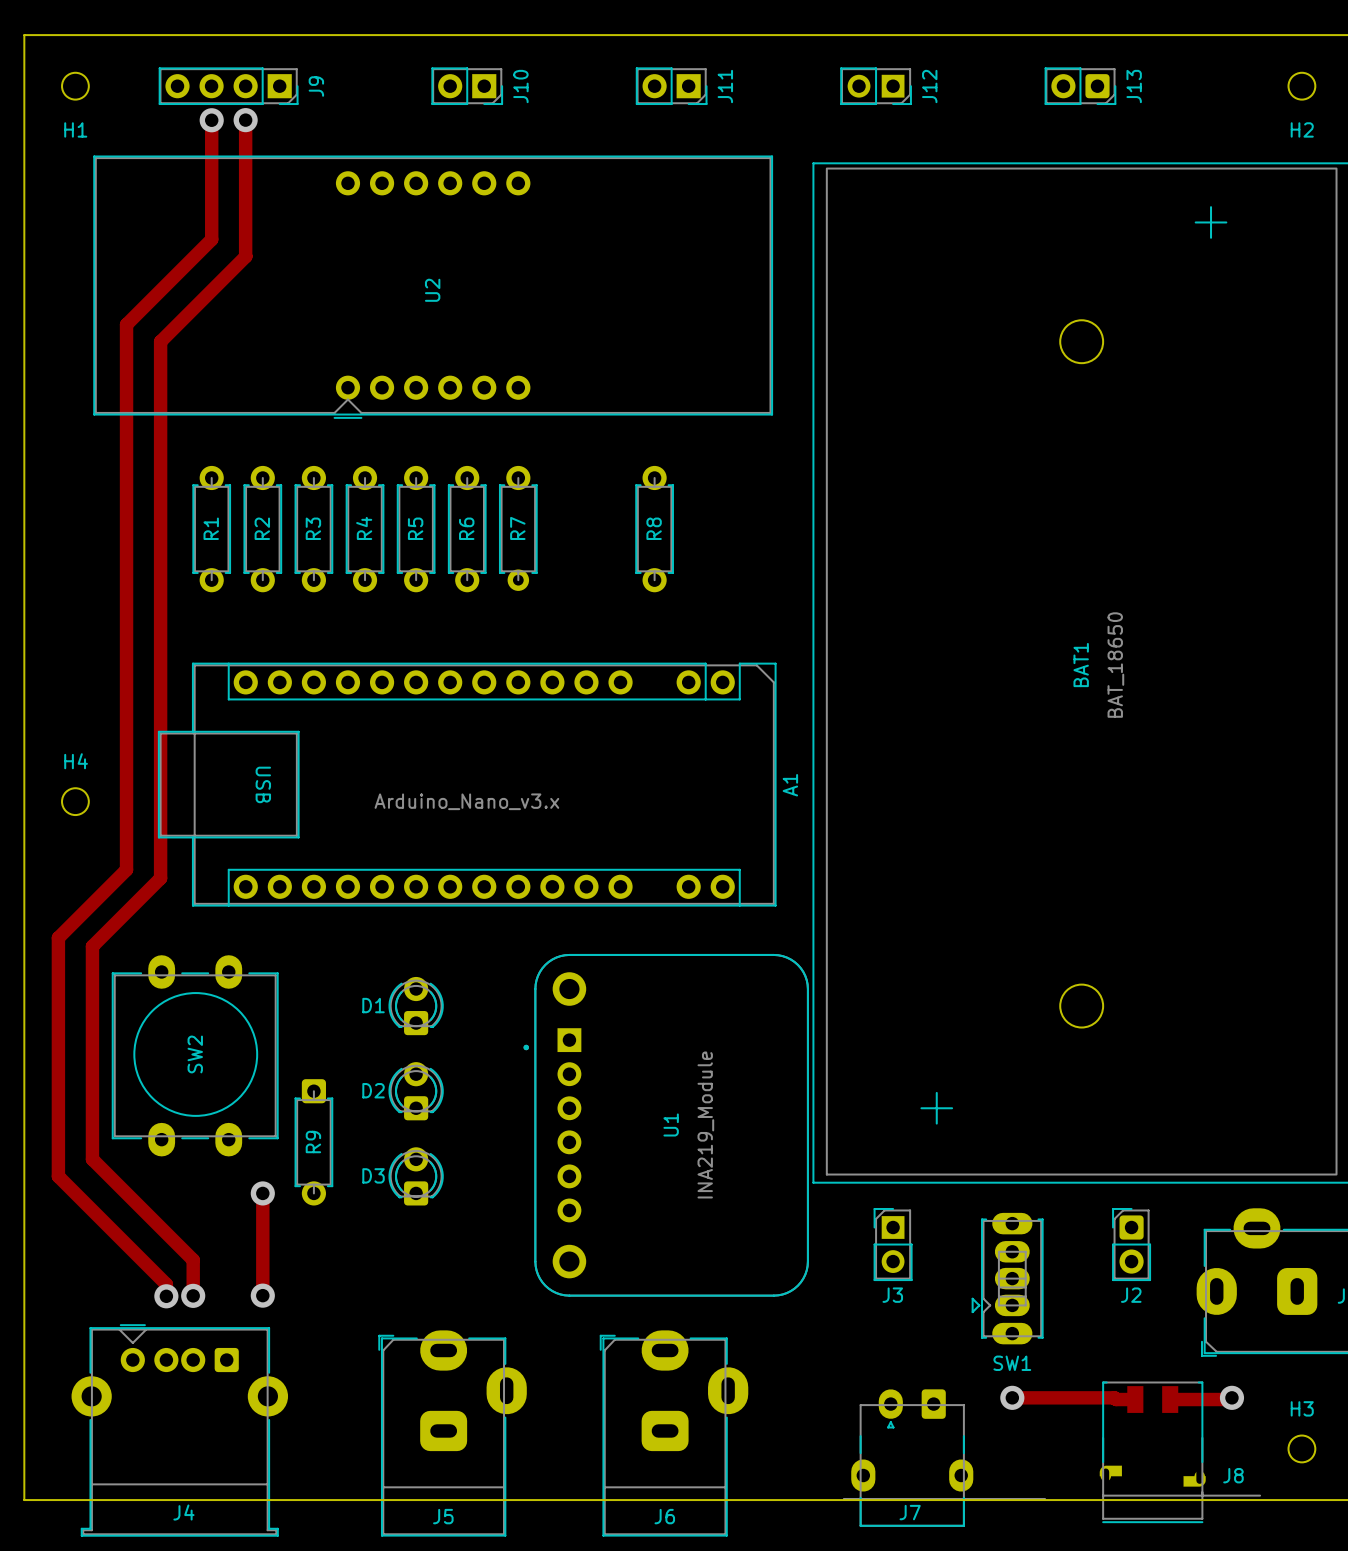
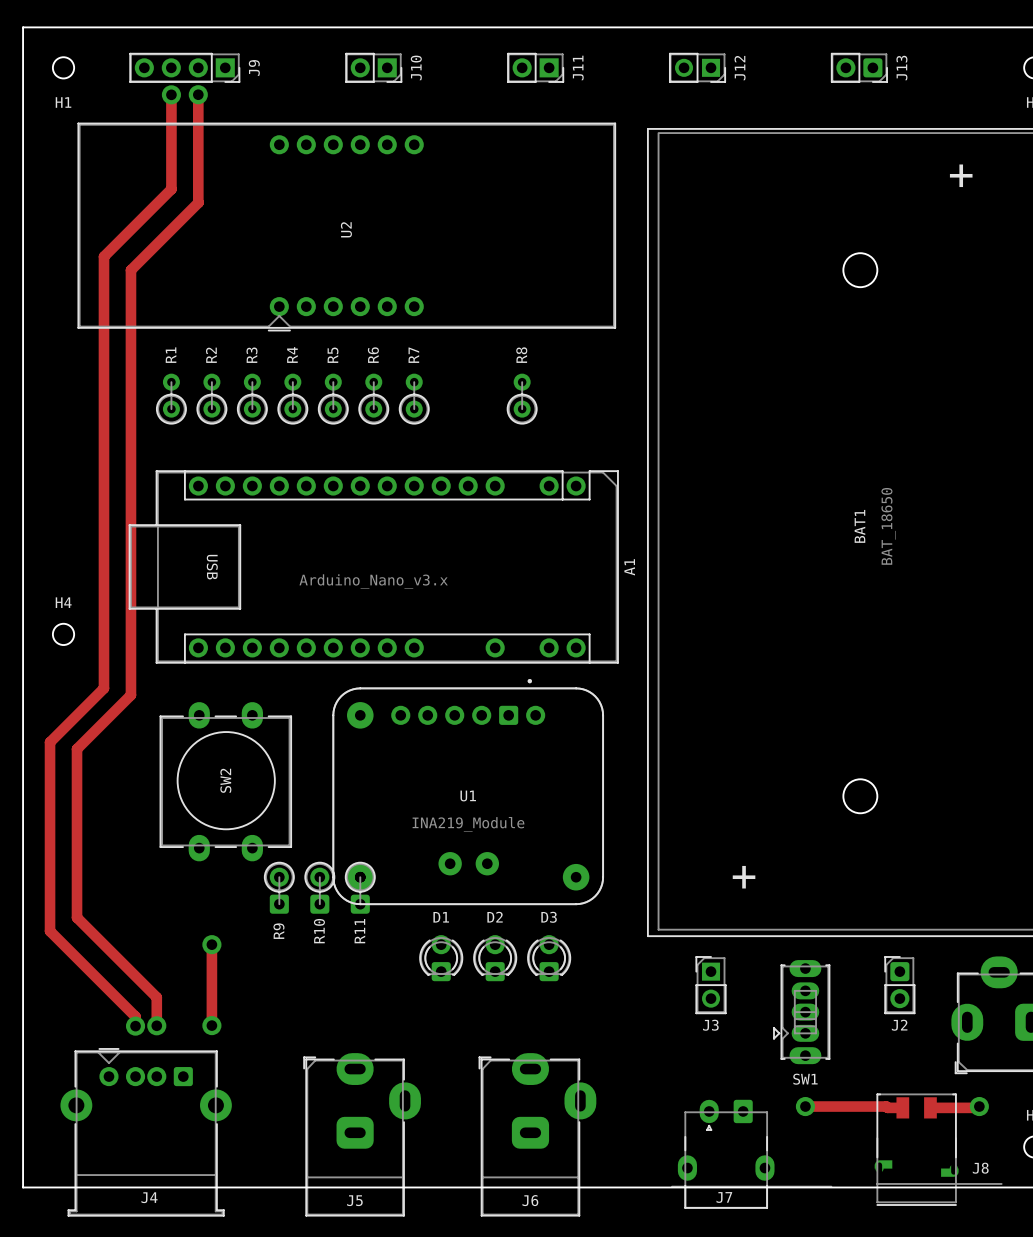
R1 footprint: [192, 465, 231, 593] -> [156, 373, 187, 425]
R2 footprint: [243, 465, 282, 593] -> [196, 373, 228, 425]
R3 footprint: [294, 465, 334, 593] -> [237, 373, 268, 425]
R4 footprint: [345, 465, 385, 593] -> [277, 373, 309, 425]
R5 footprint: [396, 465, 436, 593] -> [318, 373, 349, 425]
R6 footprint: [448, 465, 487, 593] -> [358, 373, 389, 425]
R7 footprint: [499, 465, 538, 591] -> [399, 373, 430, 425]
R8 footprint: [635, 465, 674, 593] -> [506, 373, 538, 425]
R1 name position: R1 (211, 528) -> R1 (171, 355)
R2 name position: R2 (262, 528) -> R2 (211, 355)
R3 name position: R3 (313, 528) -> R3 (251, 355)
R4 name position: R4 (364, 528) -> R4 (292, 355)
R5 name position: R5 (415, 528) -> R5 (333, 355)
R6 name position: R6 (466, 528) -> R6 (373, 355)
R7 name position: R7 (517, 528) -> R7 (413, 355)
R8 name position: R8 (654, 528) -> R8 (521, 355)
A1 footprint: [158, 662, 777, 907] -> [128, 470, 619, 664]
U1 footprint: [523, 954, 809, 1297] -> [332, 679, 604, 905]
D1 name position: D1 (373, 1005) -> D1 (441, 917)
D1 position: (416, 1006) -> (441, 958)
SW2 position: (195, 1055) -> (225, 781)
R9 footprint: [294, 1079, 334, 1206] -> [264, 862, 295, 914]
D2 name position: D2 (373, 1090) -> D2 (495, 917)
D2 position: (416, 1091) -> (495, 958)
R10: none -> (319, 887)
R11: none -> (360, 887)
U1 value position: INA219_Module (705, 1124) -> INA219_Module (468, 824)
R9 name position: R9 (313, 1142) -> R9 (278, 931)
D3 name position: D3 (373, 1175) -> D3 (549, 917)
D3 position: (416, 1176) -> (549, 958)

